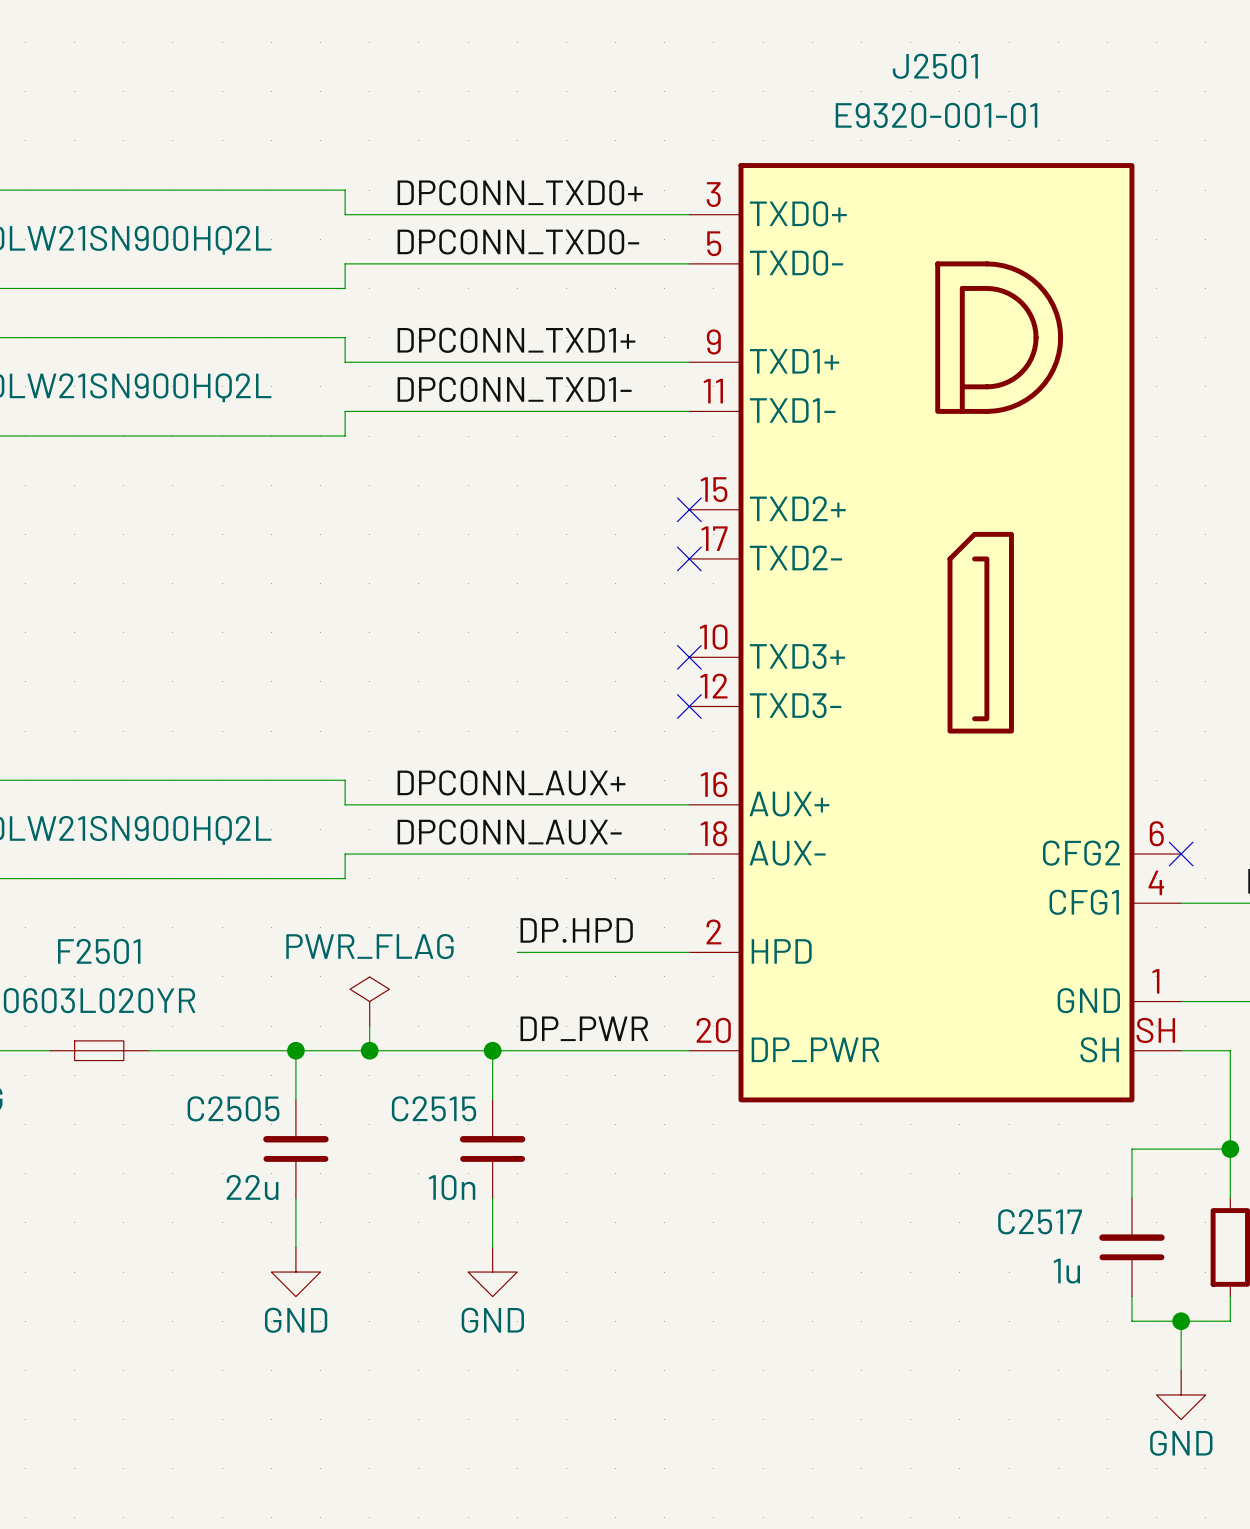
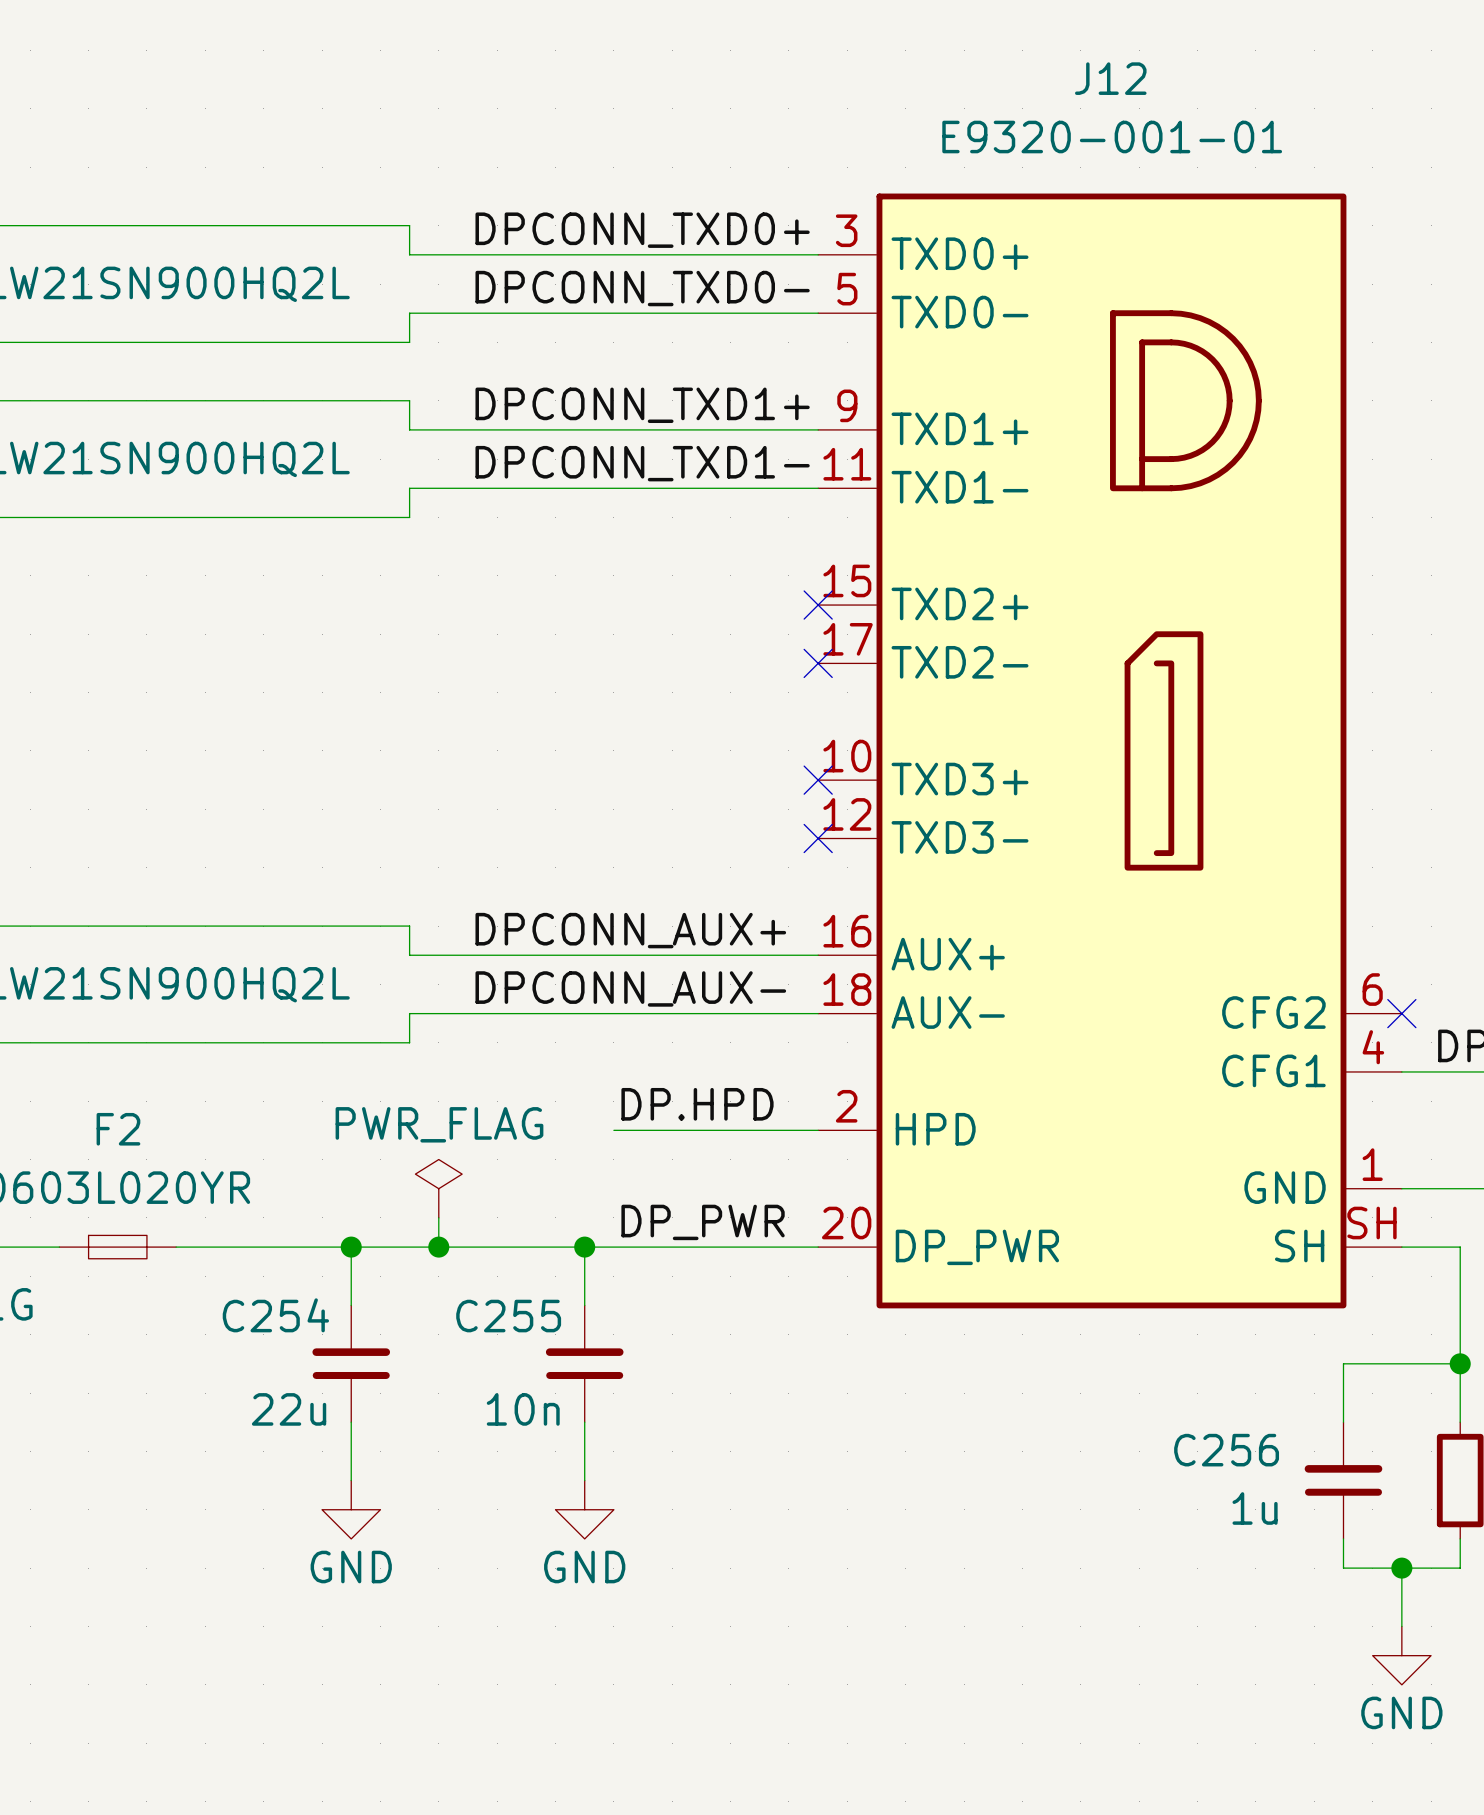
J2501 name: J2501 (935, 66) -> J12 (1110, 78)
F2501 name: F2501 (99, 951) -> F2 (118, 1129)
C2505 name: C2505 (233, 1108) -> C254 (275, 1315)
C2515 name: C2515 (434, 1108) -> C255 (508, 1316)
C2517 name: C2517 (1040, 1221) -> C256 (1226, 1450)

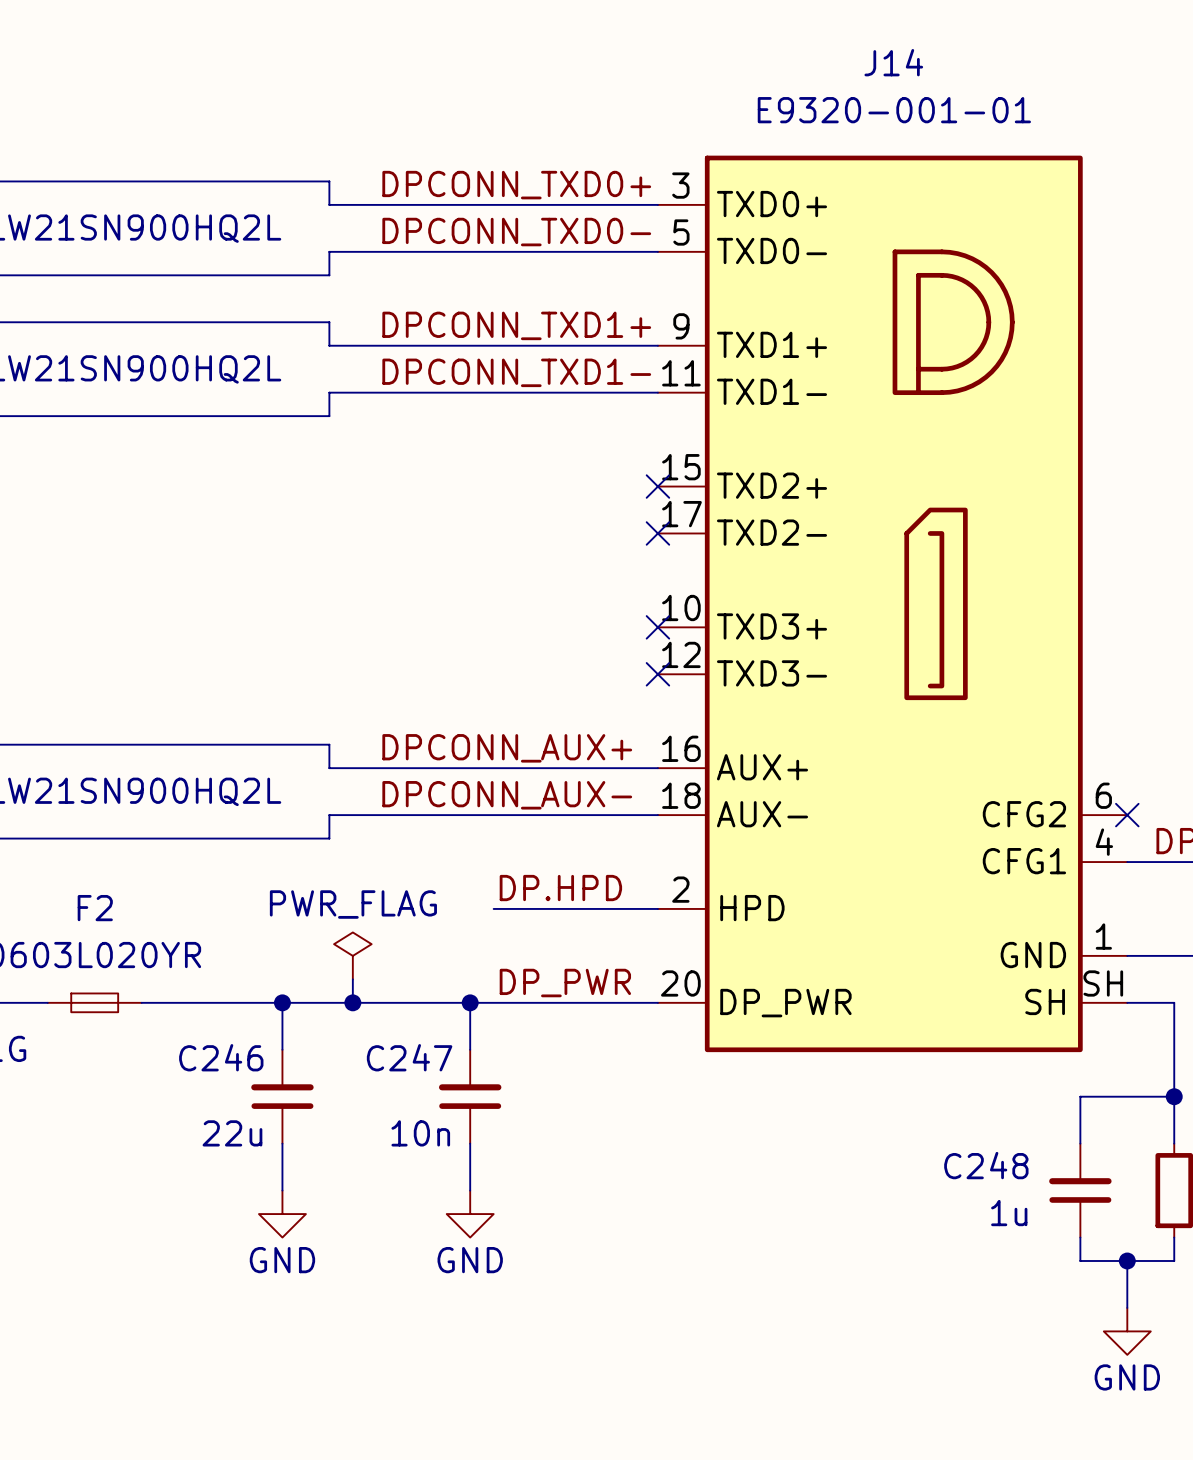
J12 name: J12 (1110, 78) -> J14 (893, 62)
C254 name: C254 (275, 1315) -> C246 (221, 1057)
C255 name: C255 (508, 1316) -> C247 (409, 1057)
C256 name: C256 (1226, 1450) -> C248 (986, 1165)

